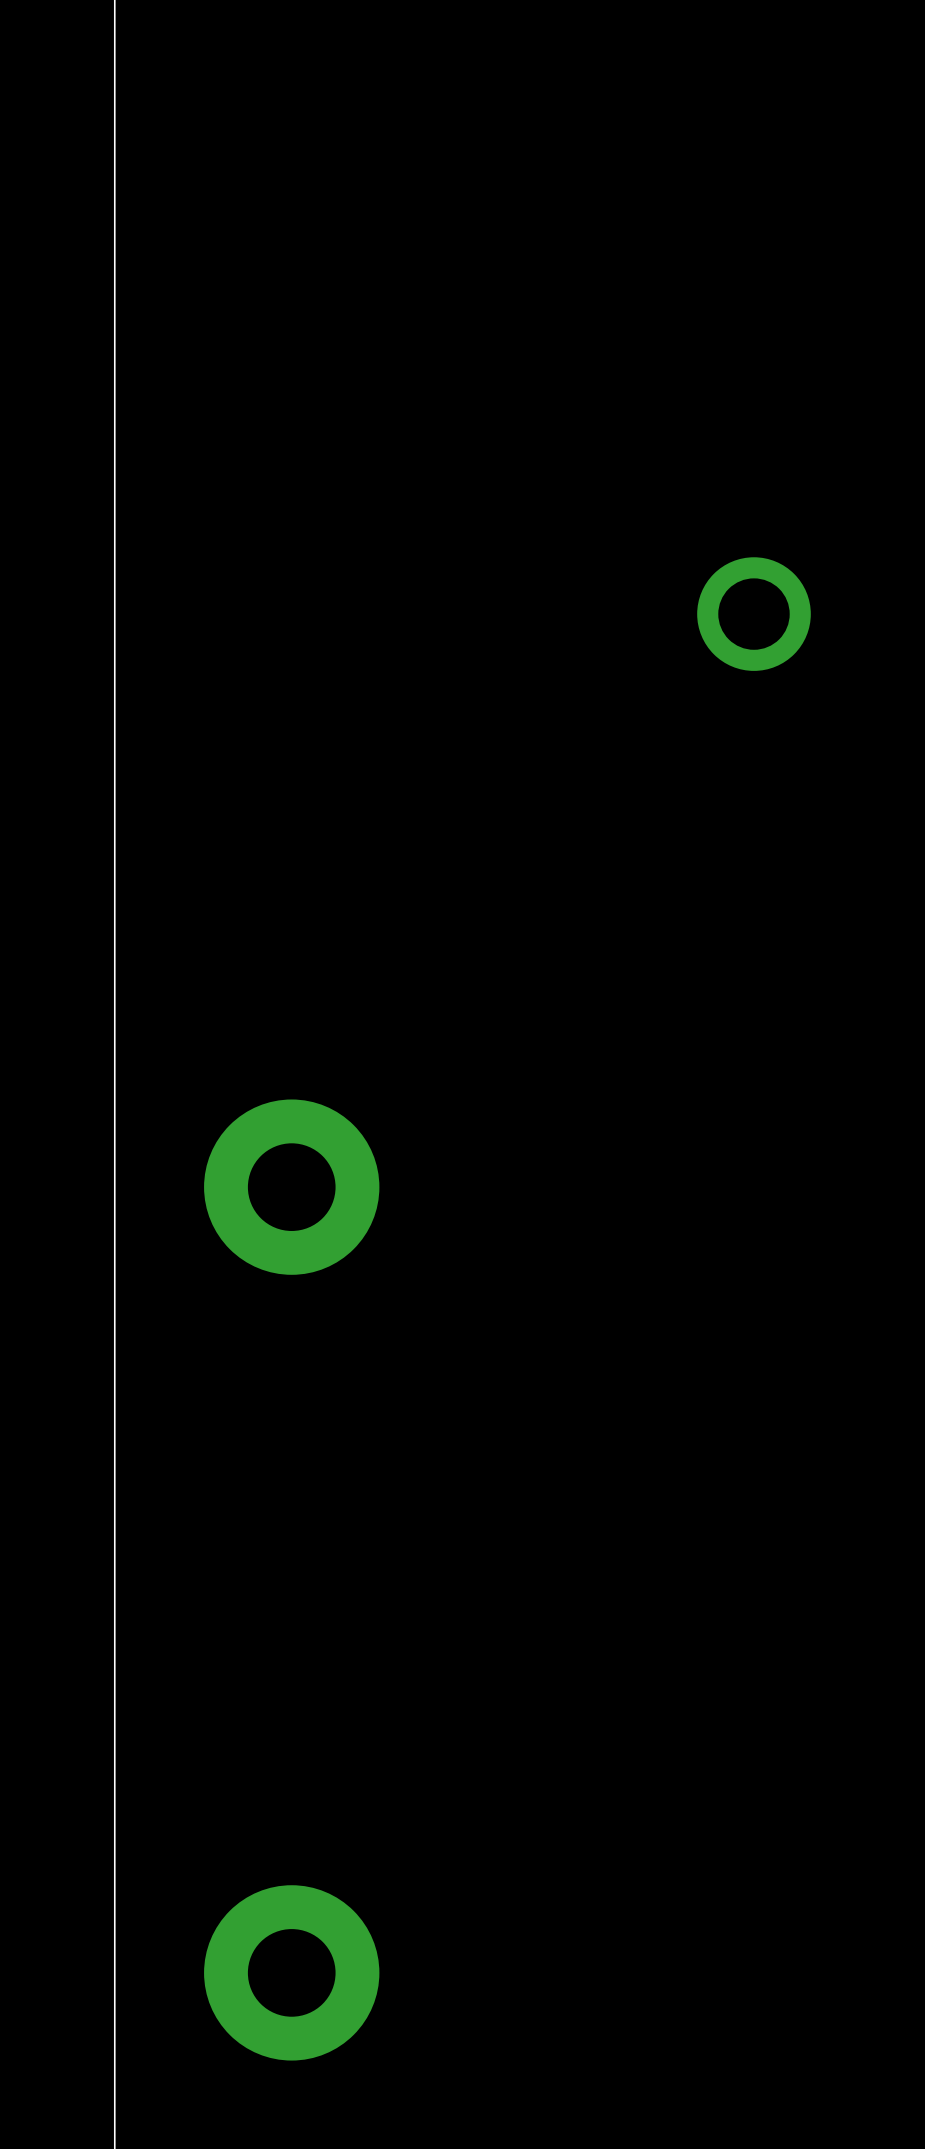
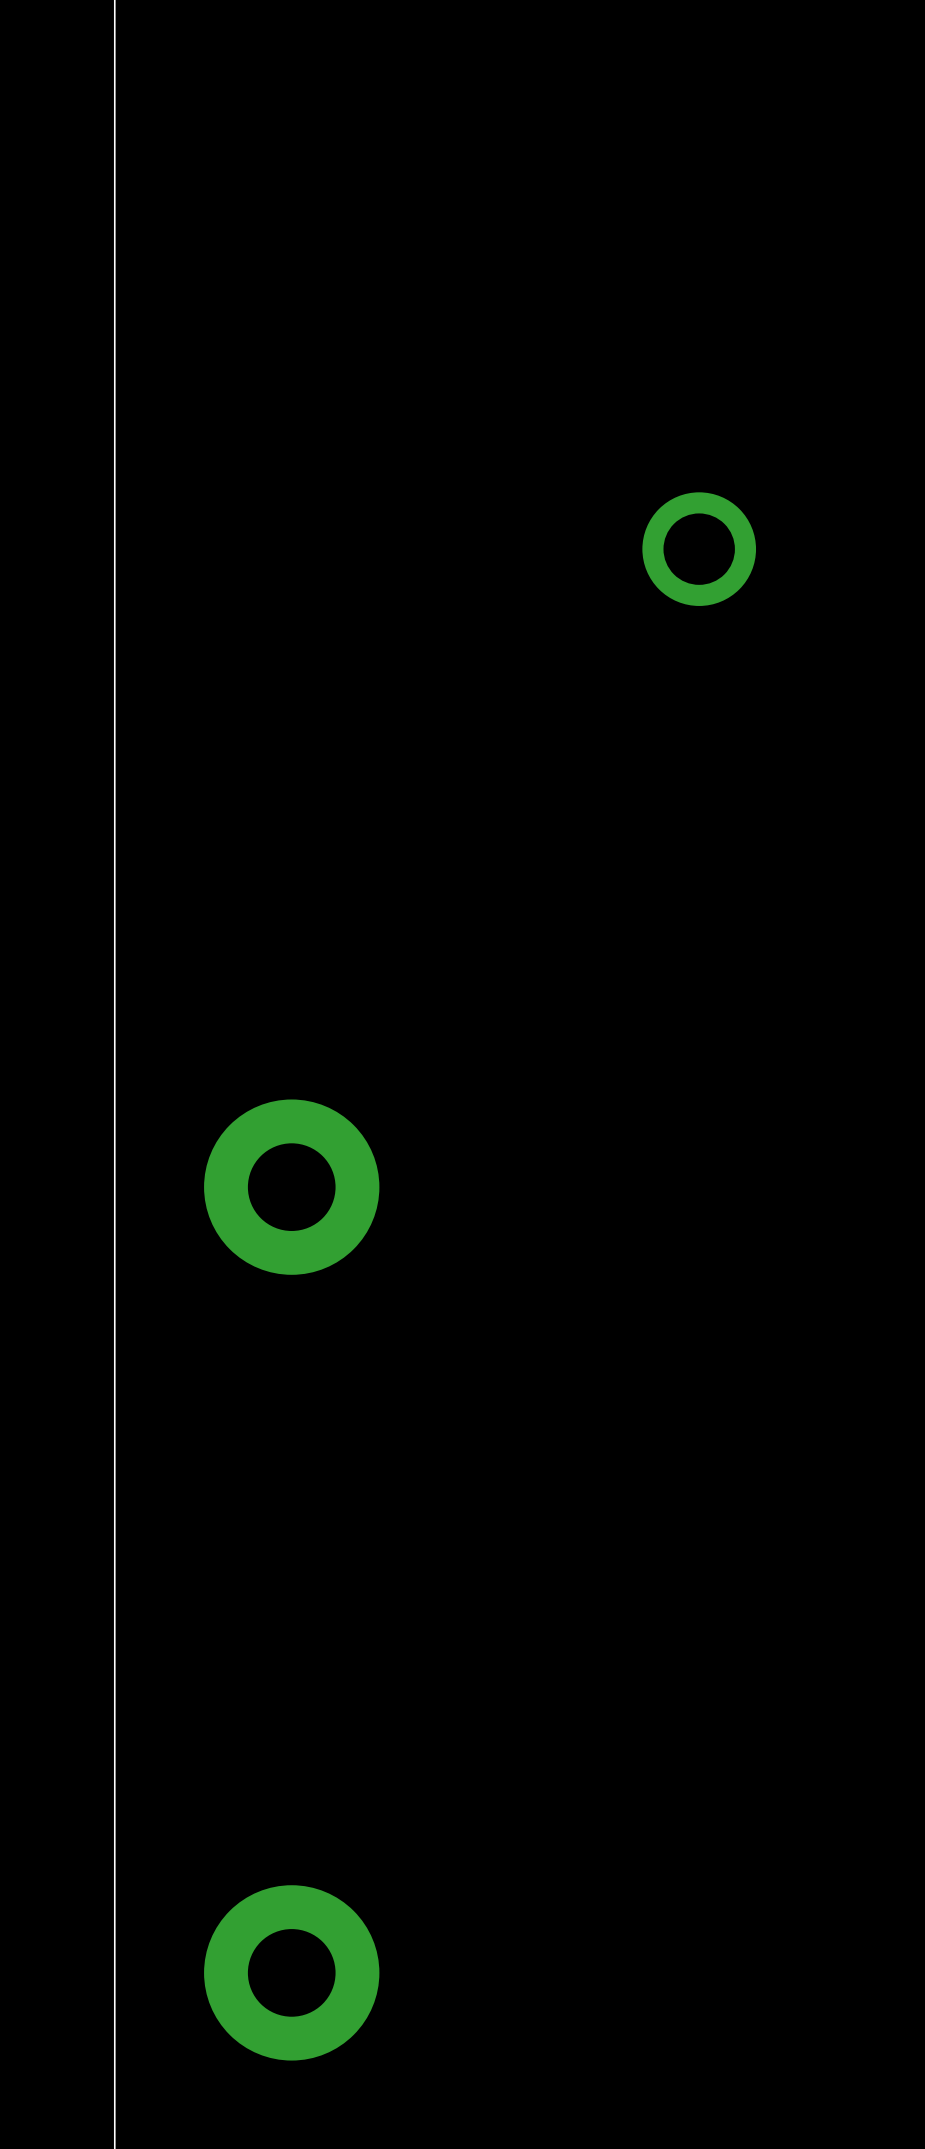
part position: (753, 614) -> (699, 549)

